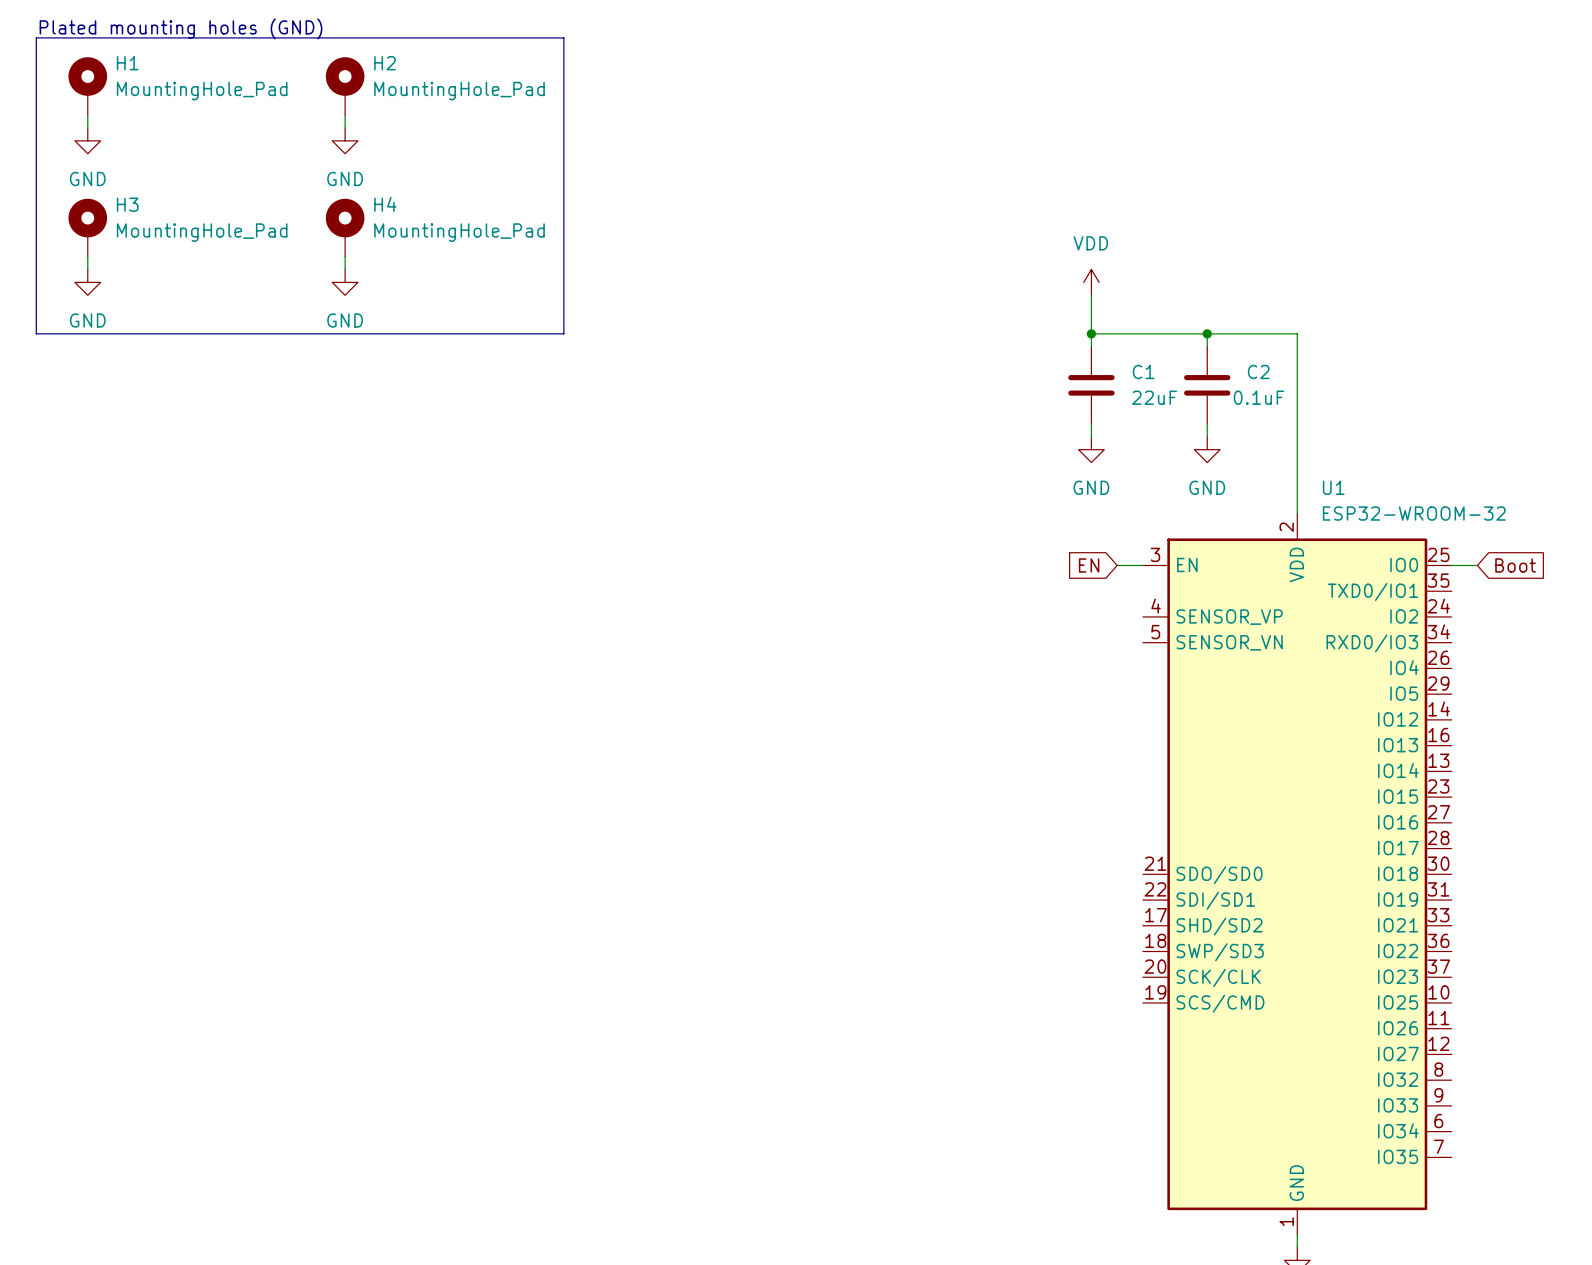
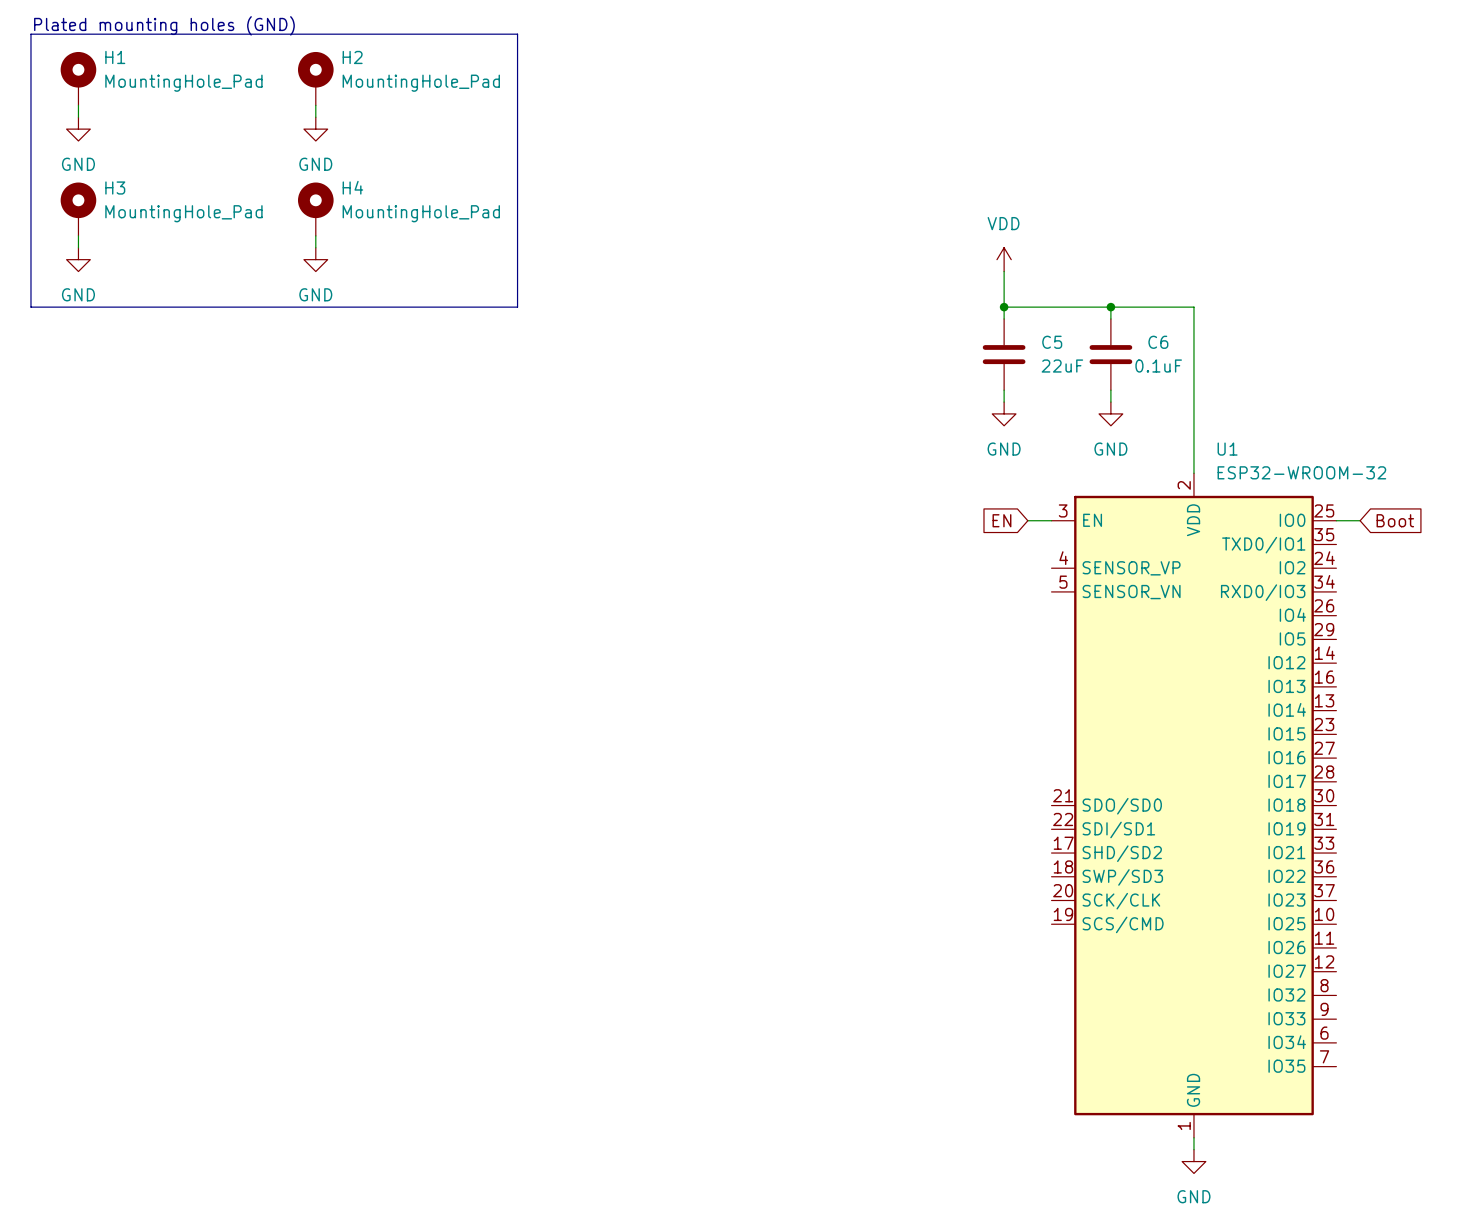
C1 name: C1 (1143, 371) -> C5 (1052, 342)
C2 name: C2 (1258, 371) -> C6 (1158, 342)

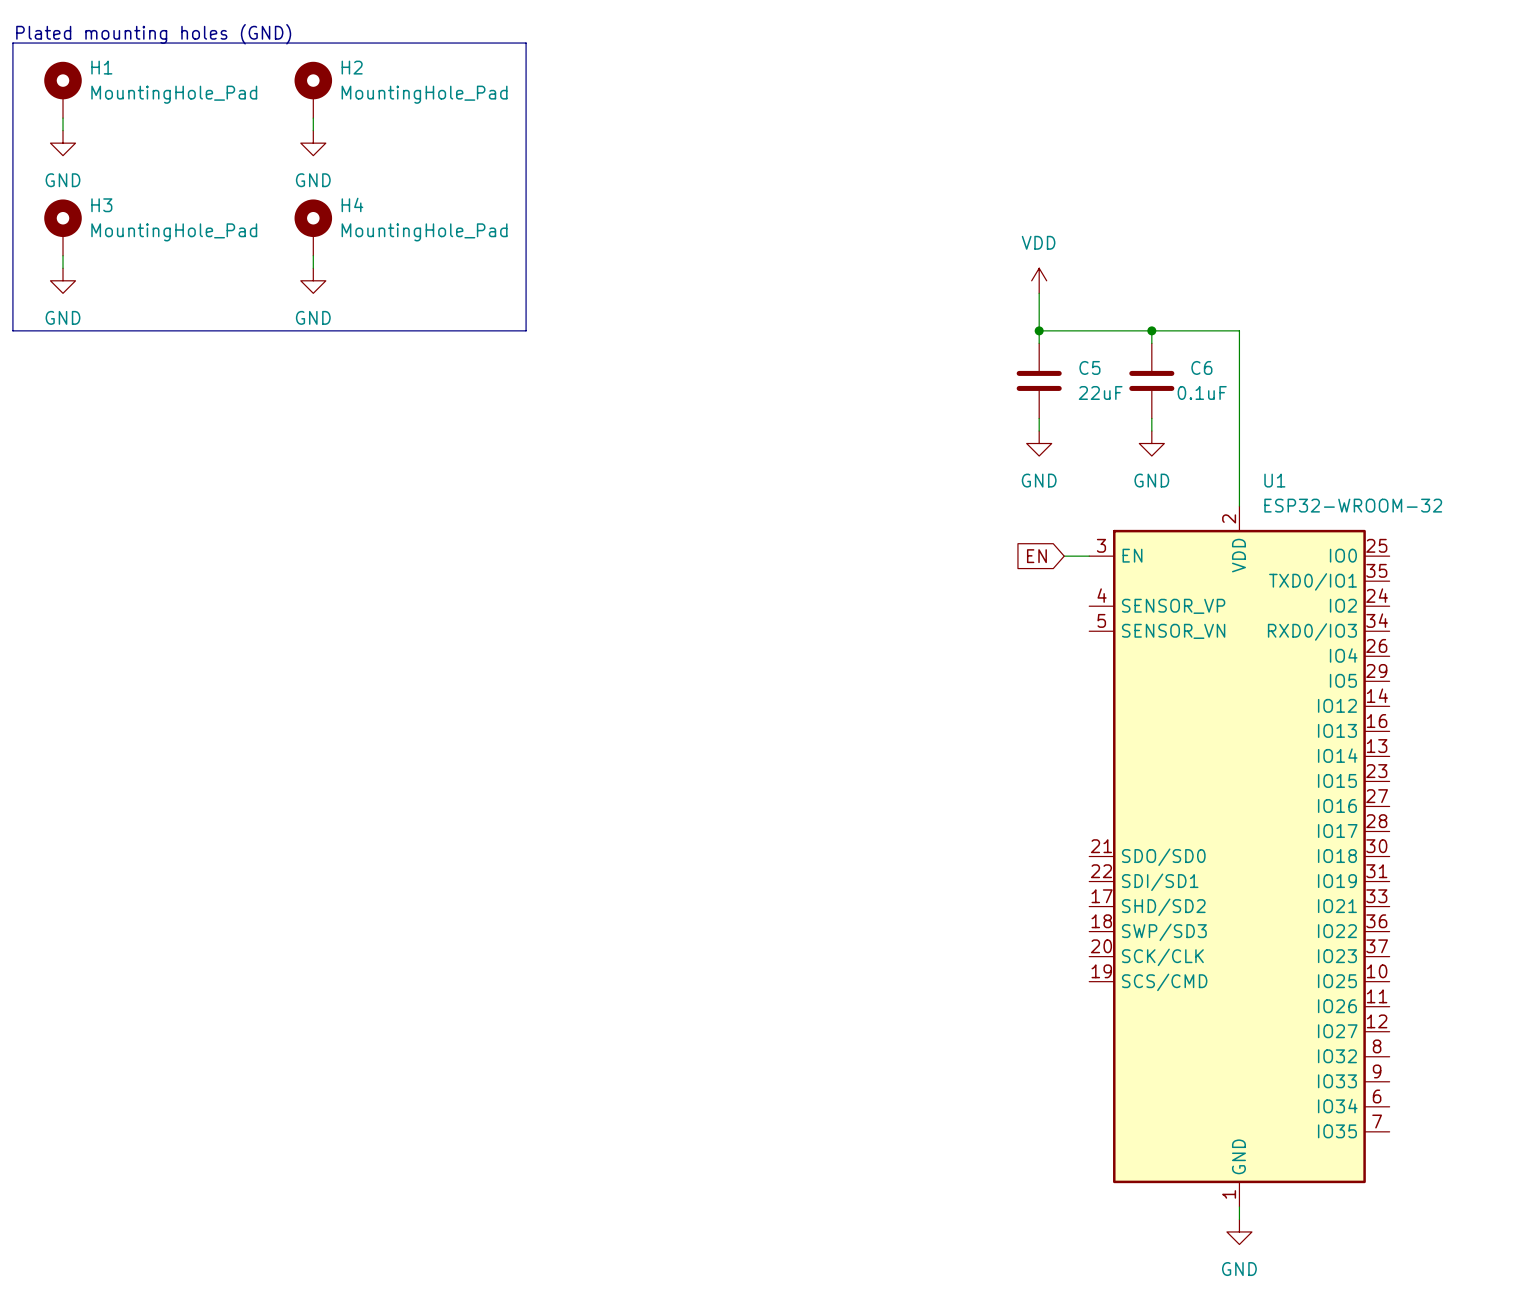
wire: (1336, 520) (1360, 520) -> none
global label: Boot (1395, 520) -> none

